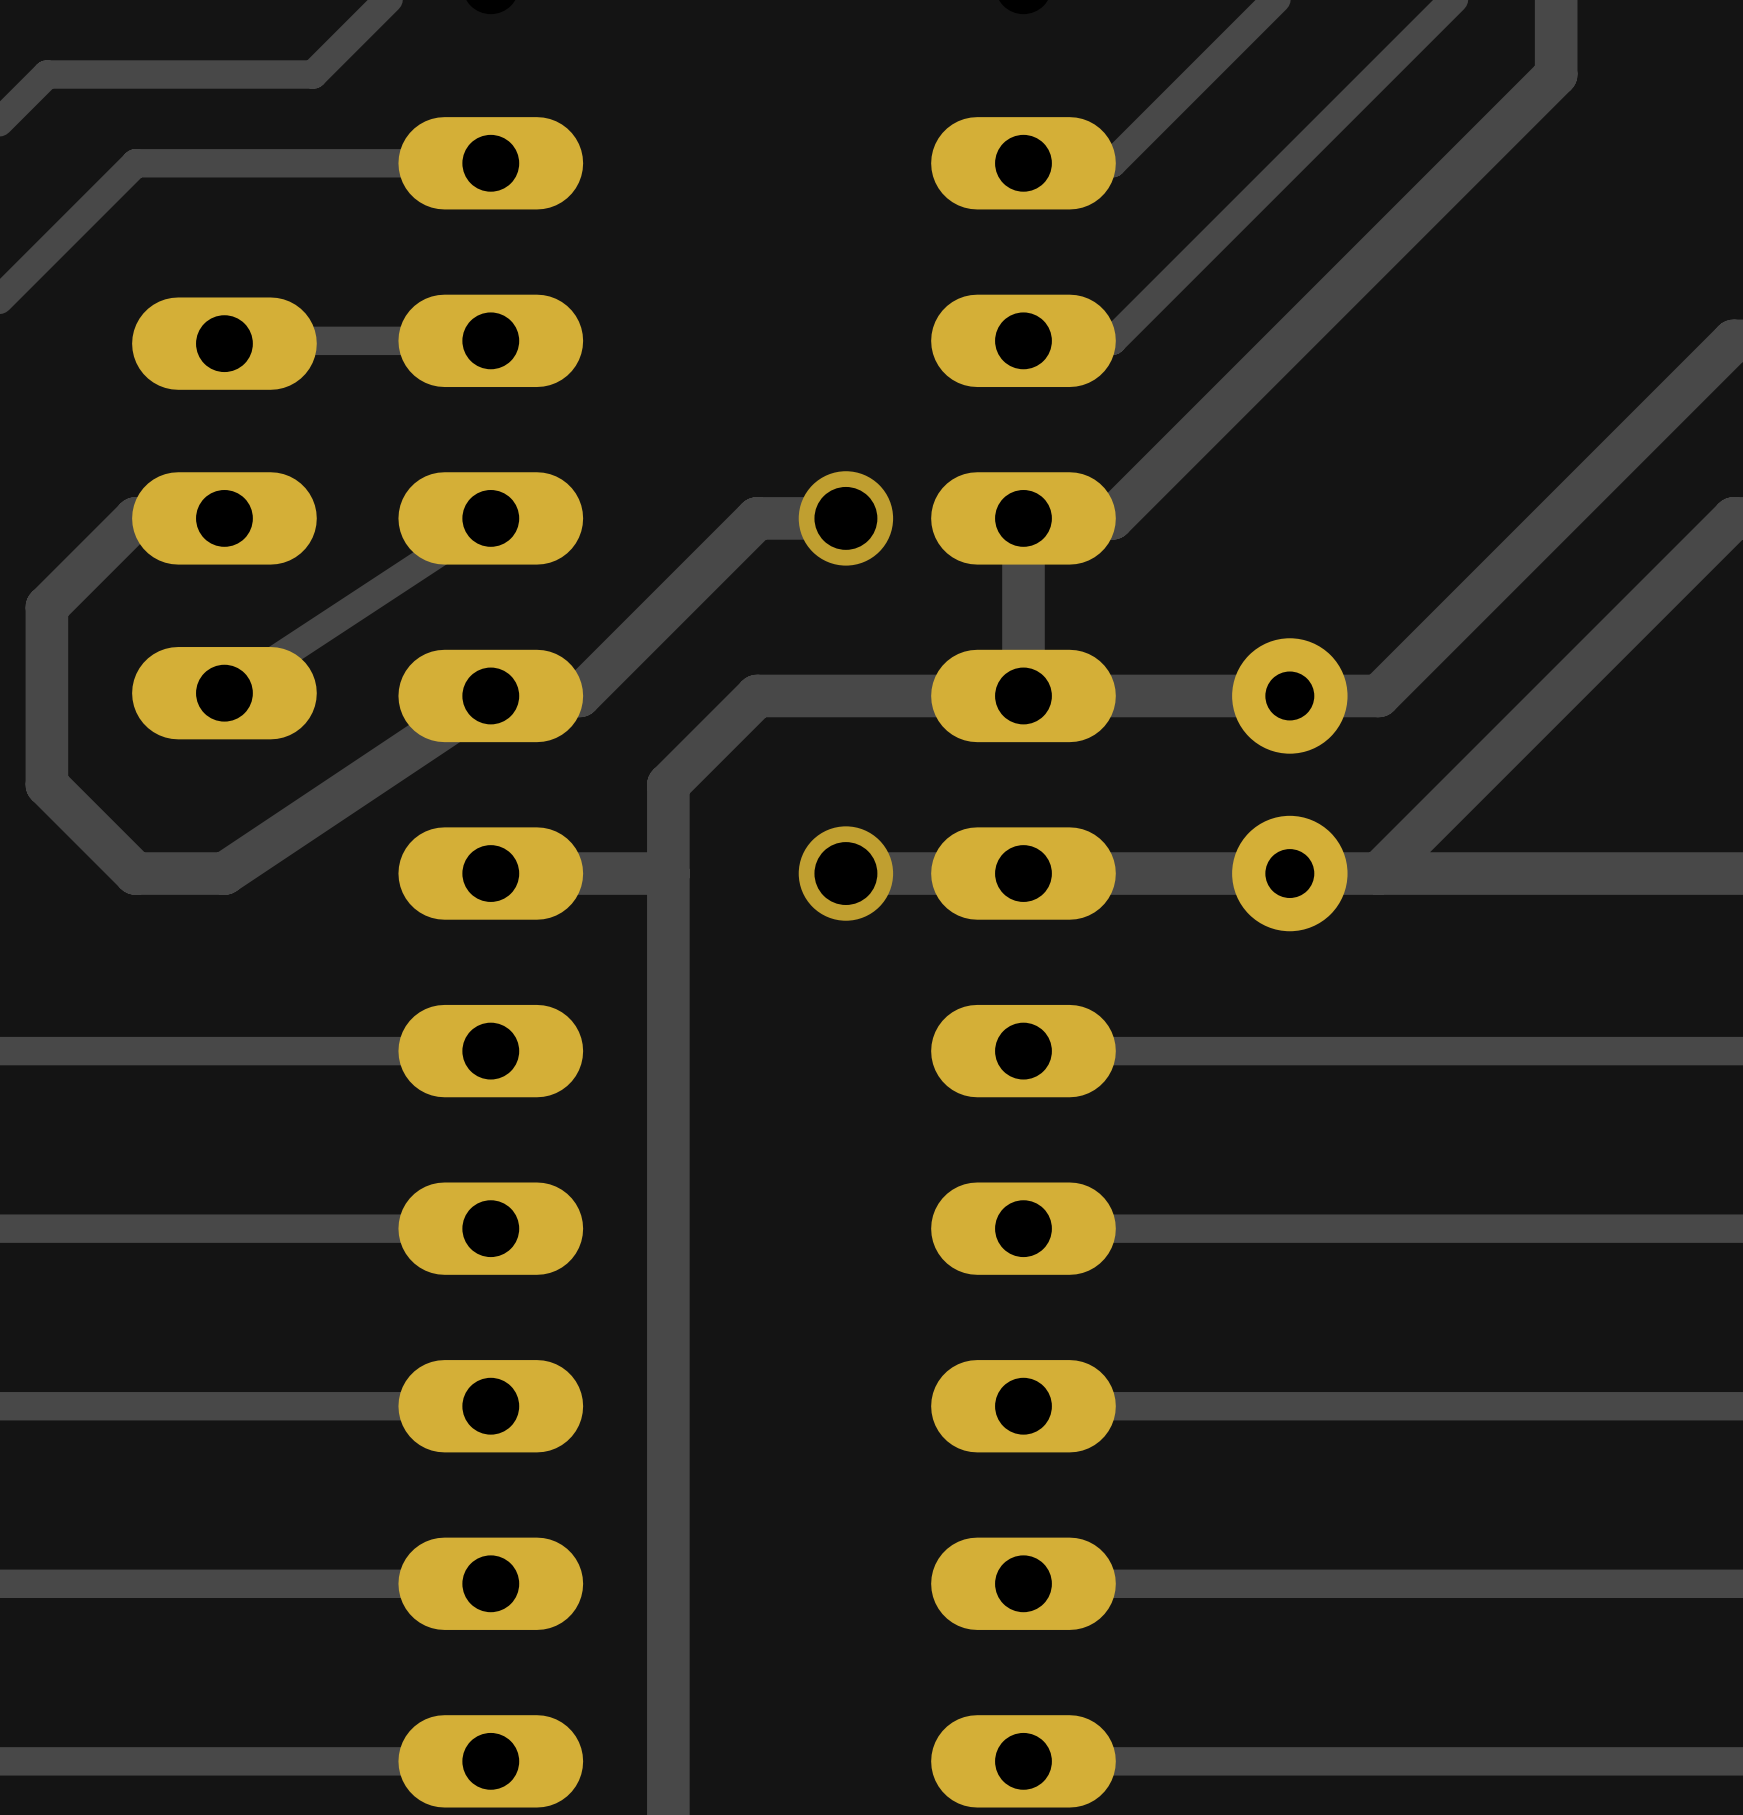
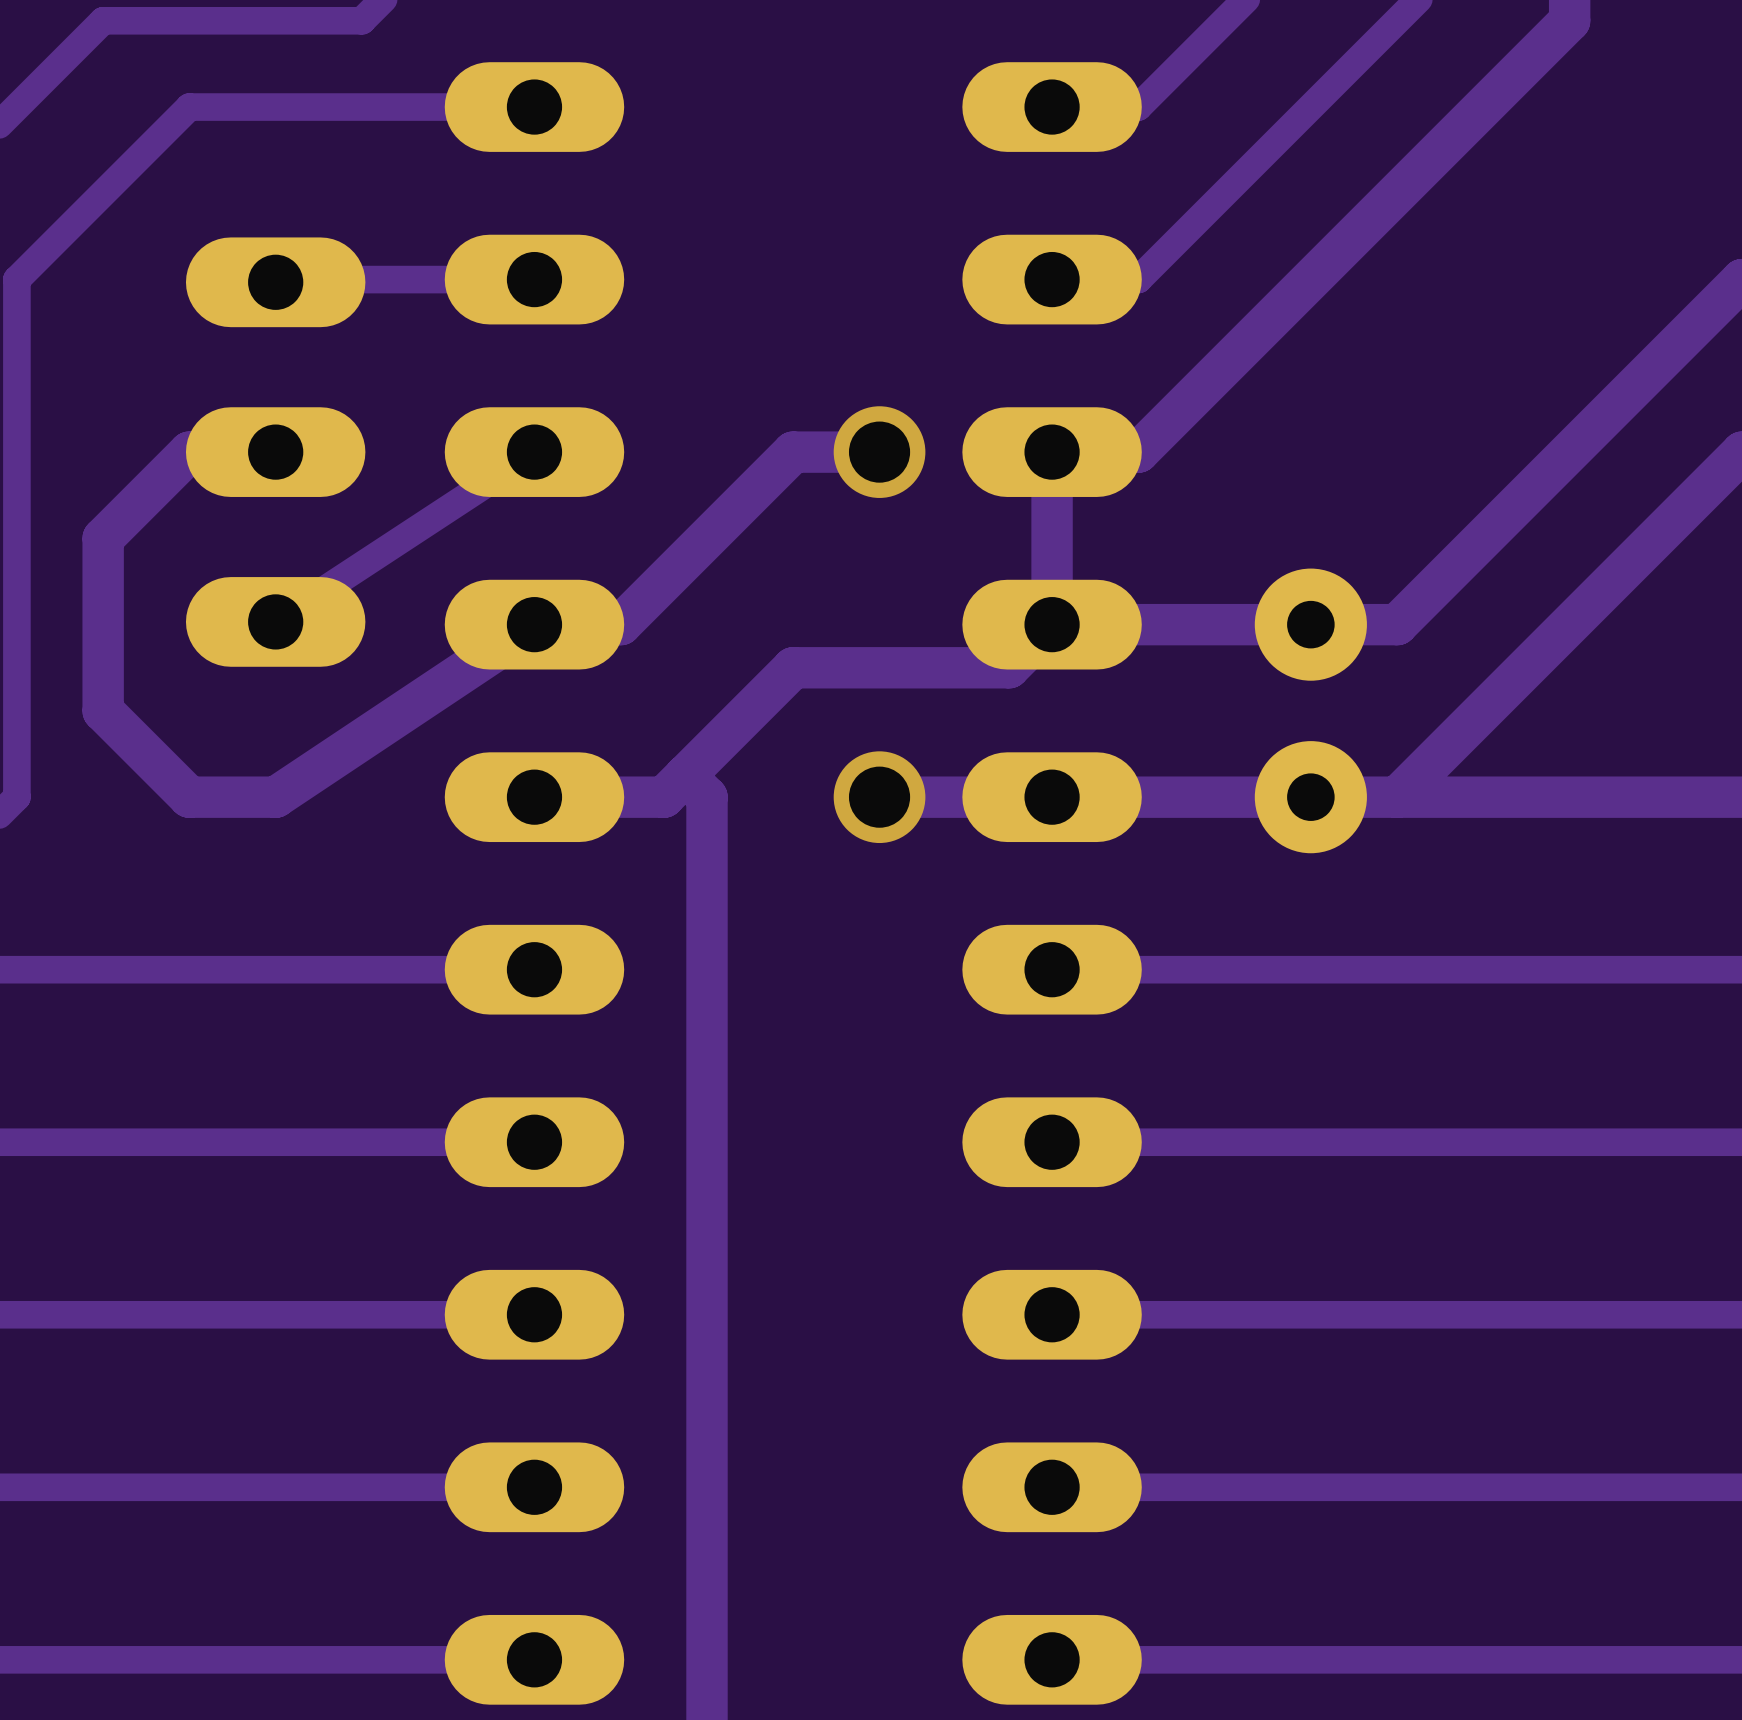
track: (1023, 695) (757, 695) (668, 784) (668, 873) (623, 873) -> (1052, 624) (1008, 667) (793, 667) (663, 797)

